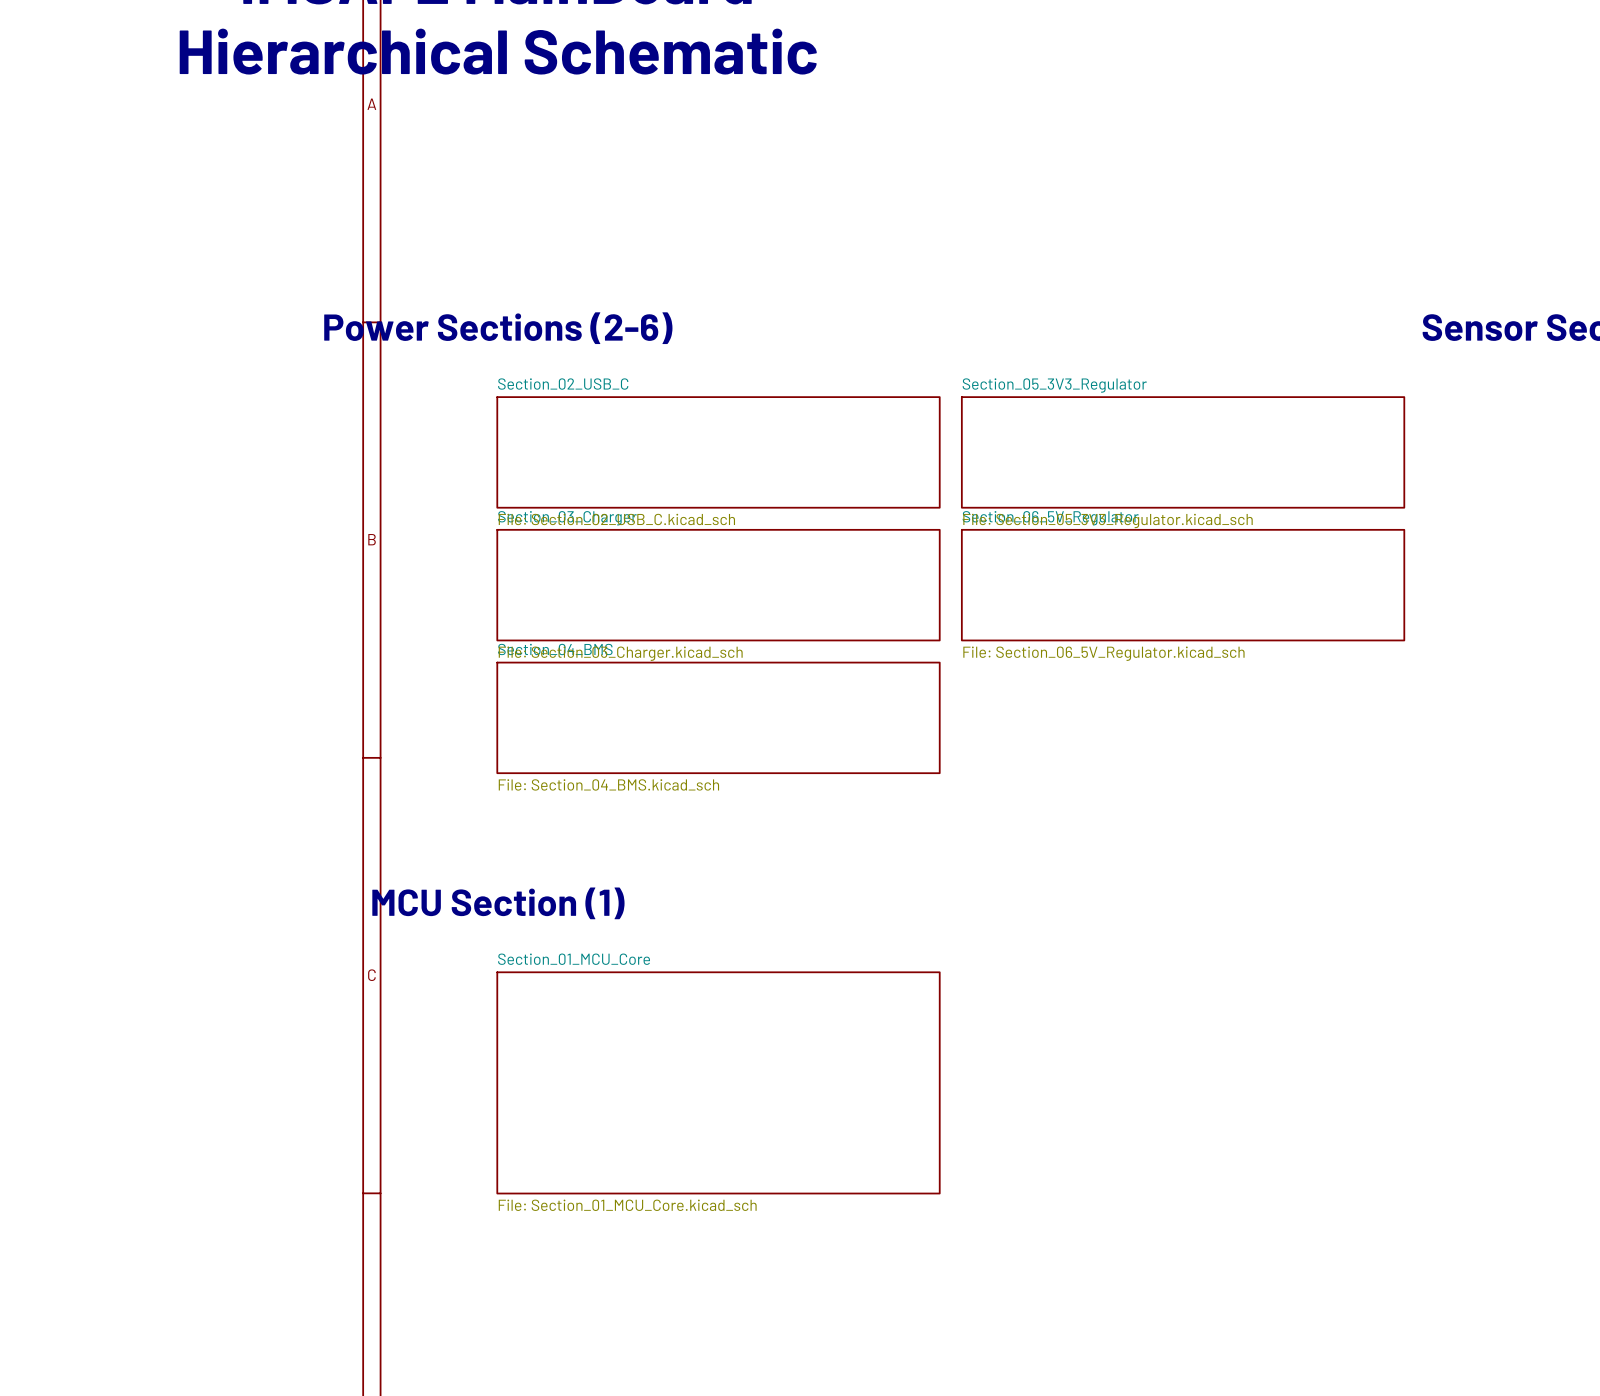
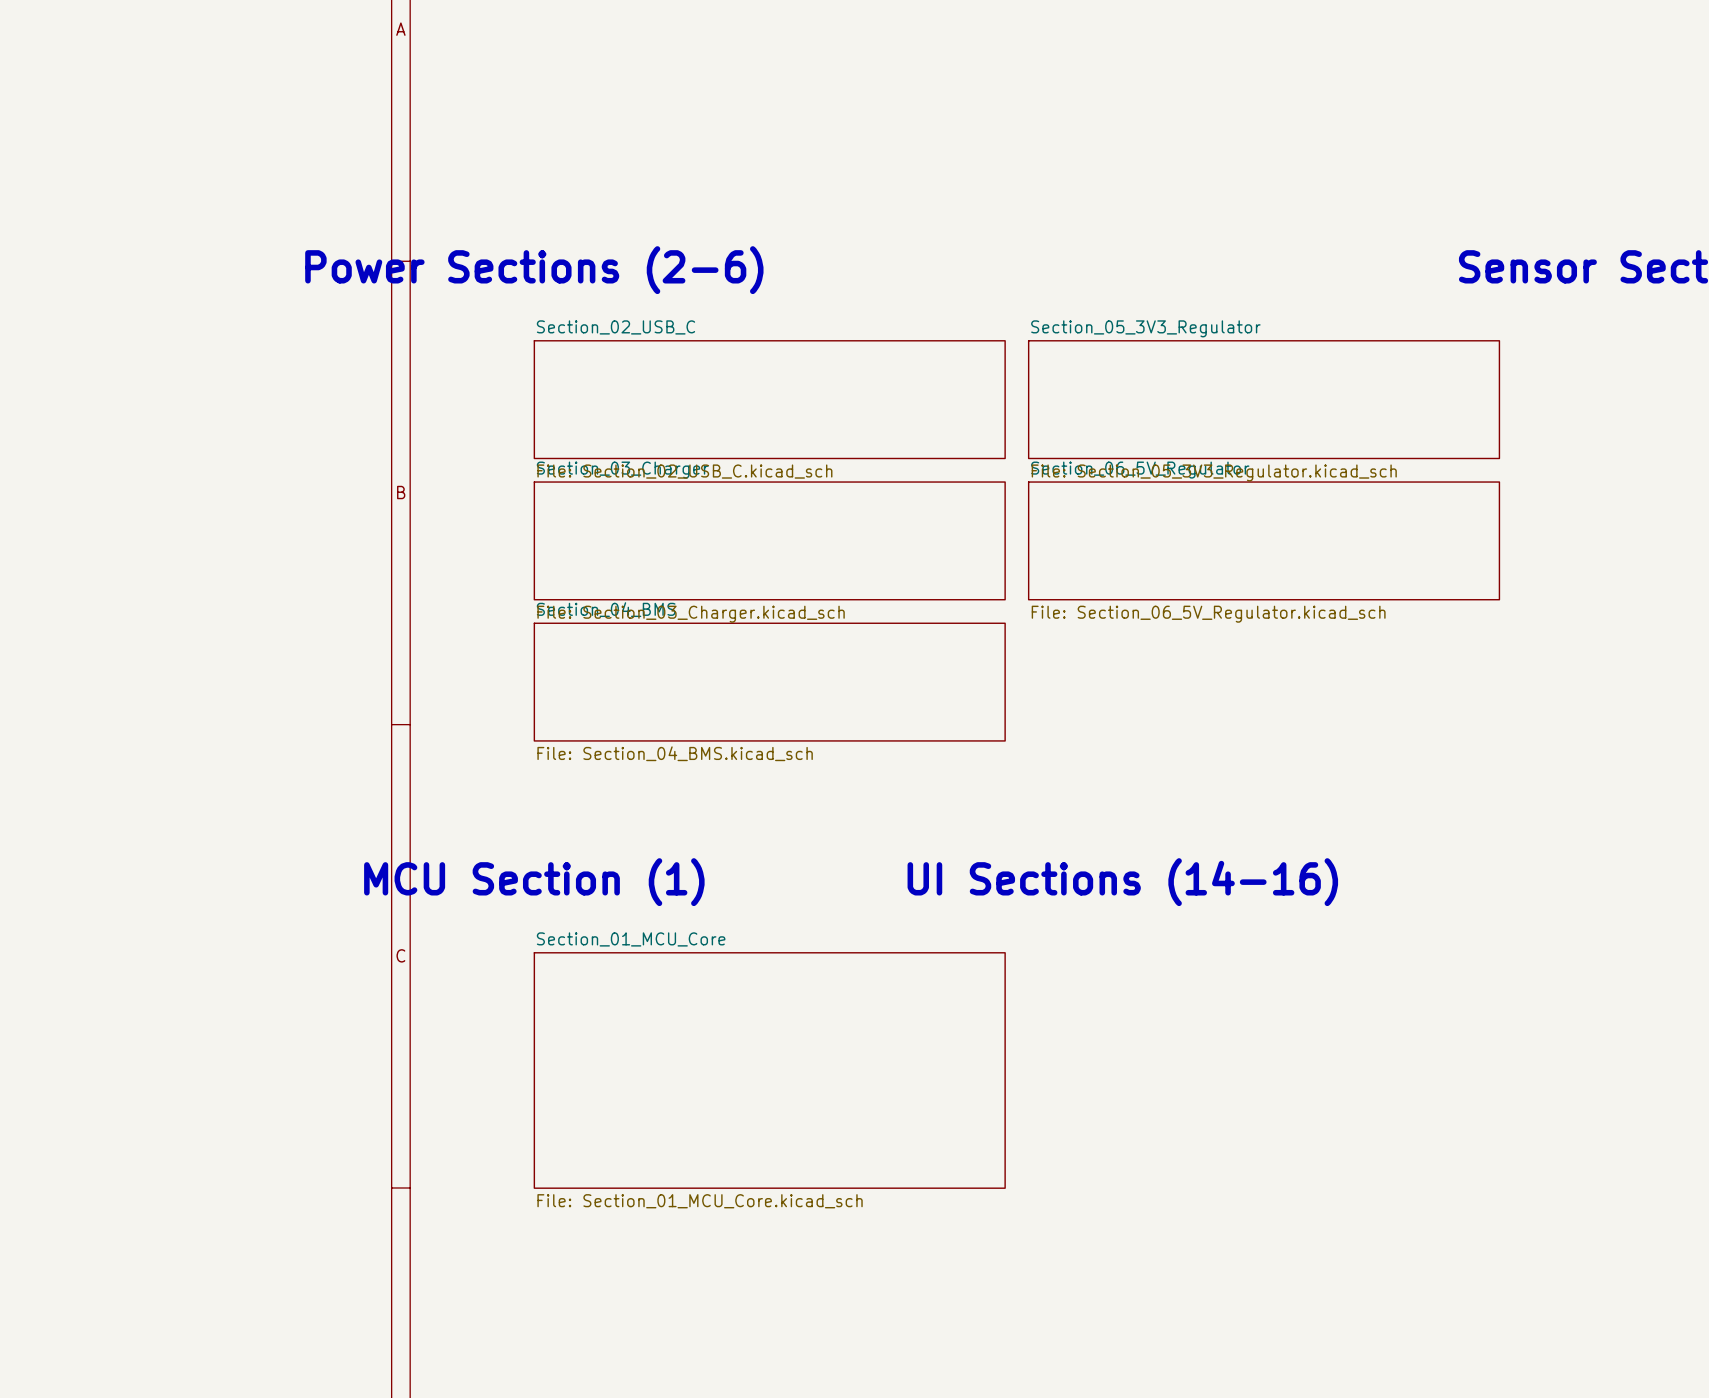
text: none -> UI Sections (14-16) (1122, 882)

